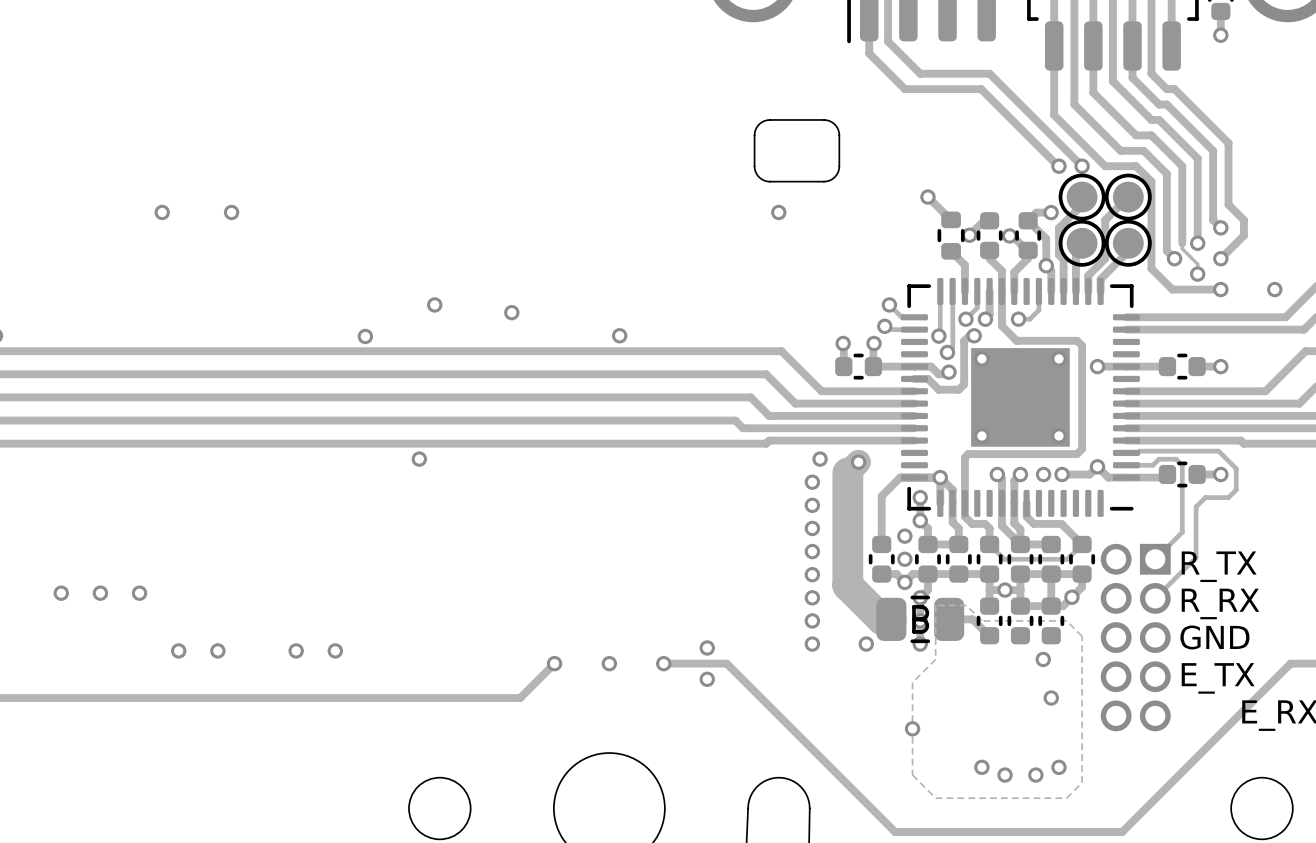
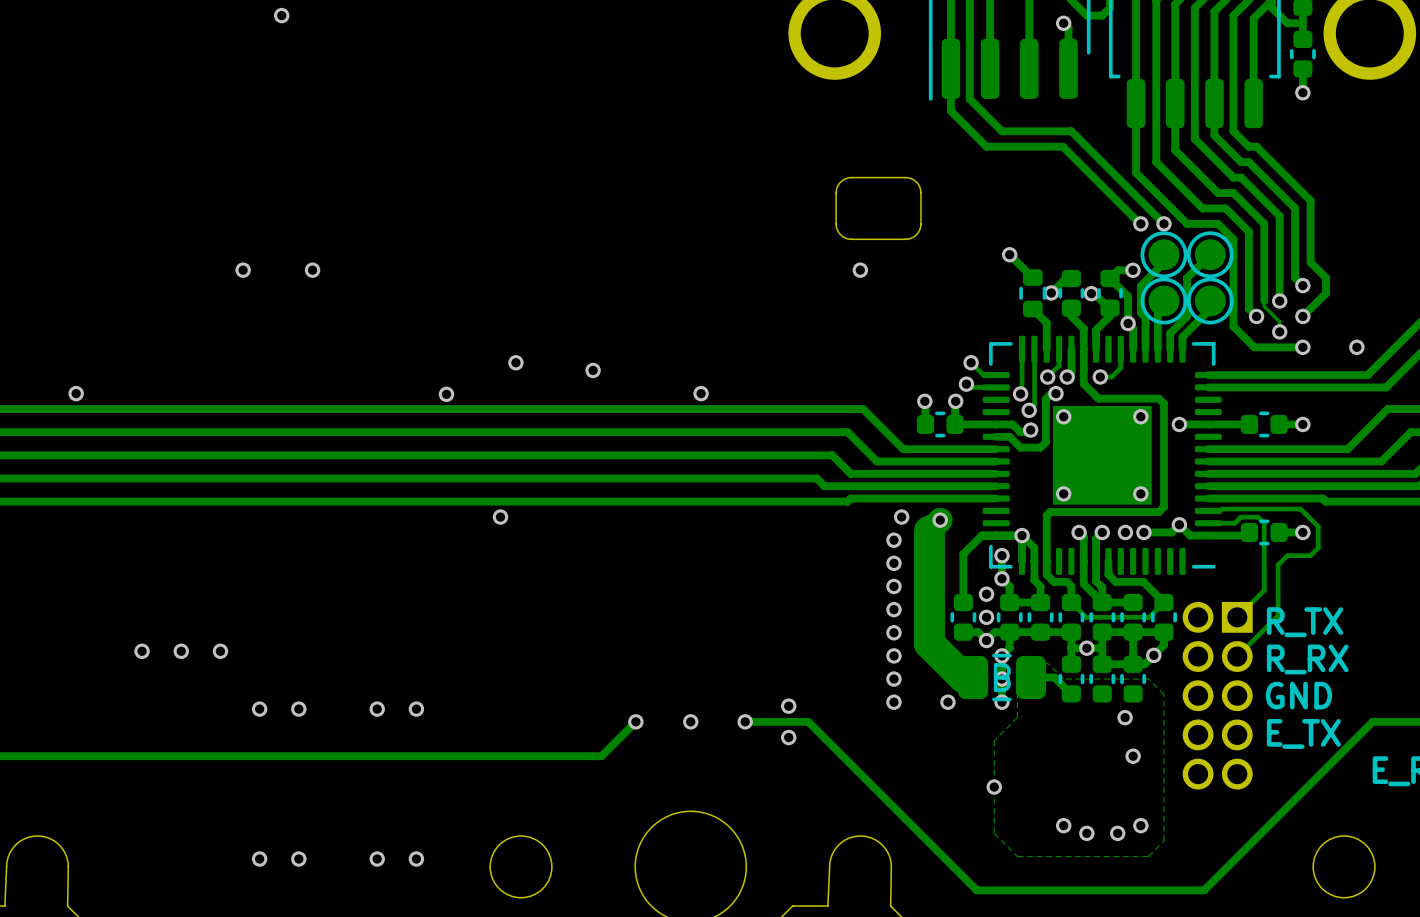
via: none -> (259, 859)
via: none -> (298, 859)
via: none -> (377, 859)
via: none -> (416, 859)

